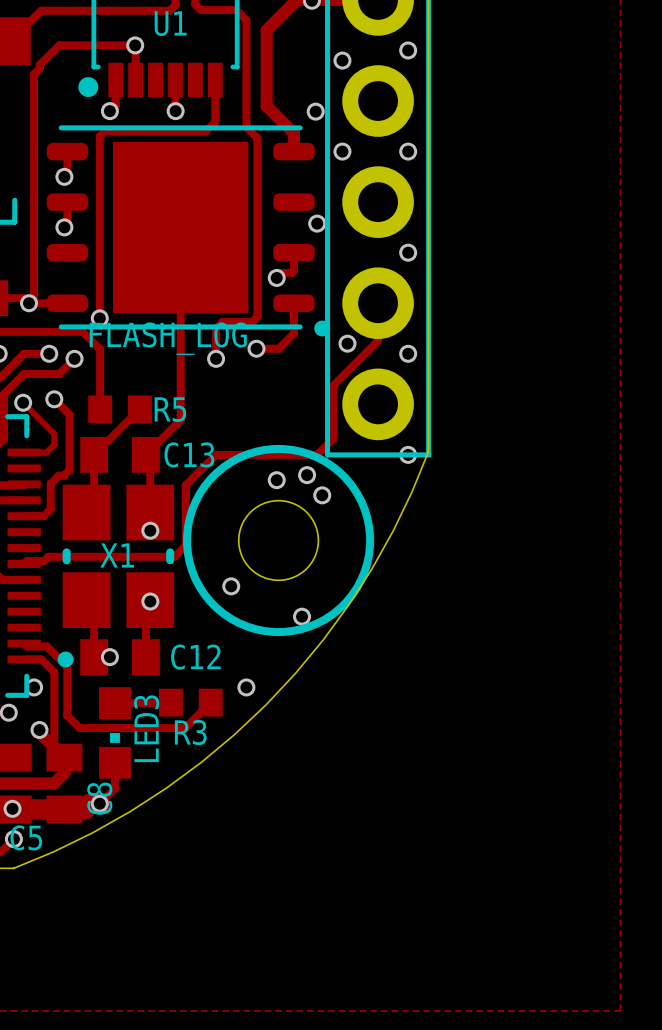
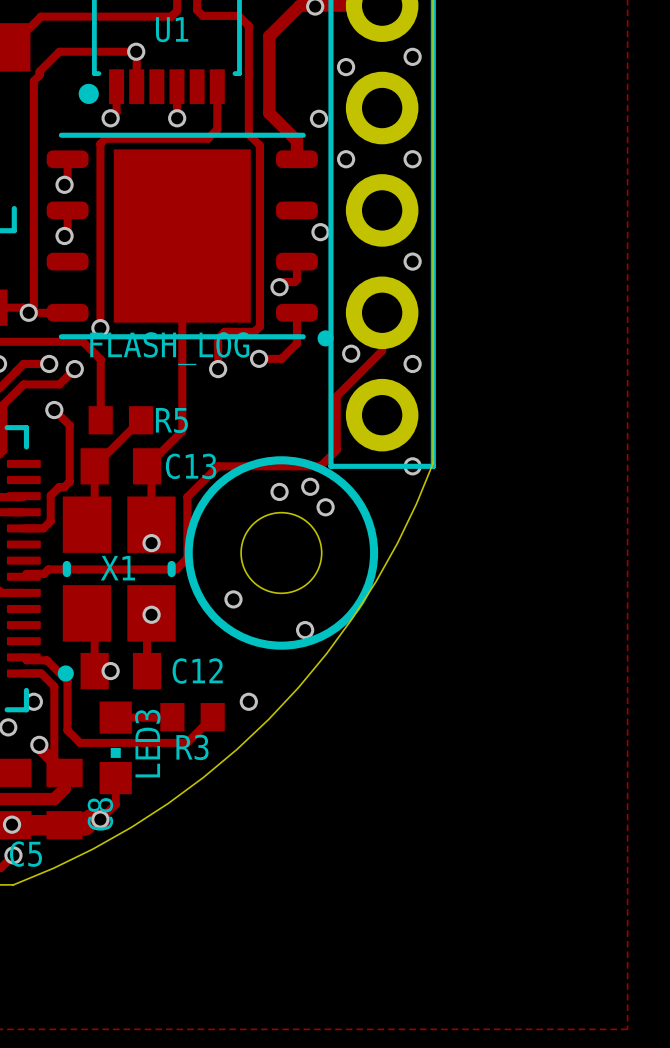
track: (23, 402) (54, 433) (54, 444) (46, 452) (24, 452) -> none
via: (23, 402) -> none

